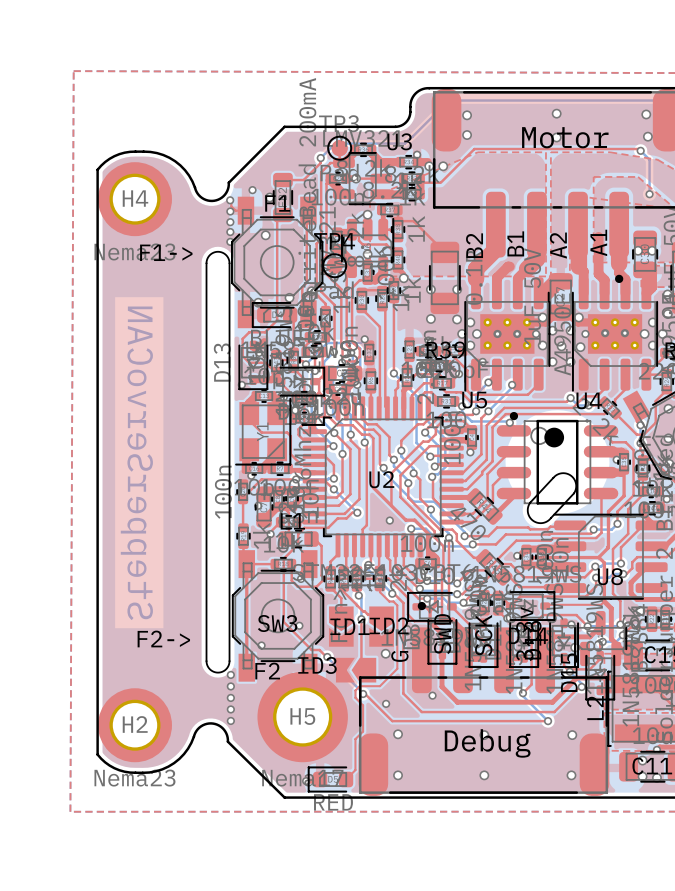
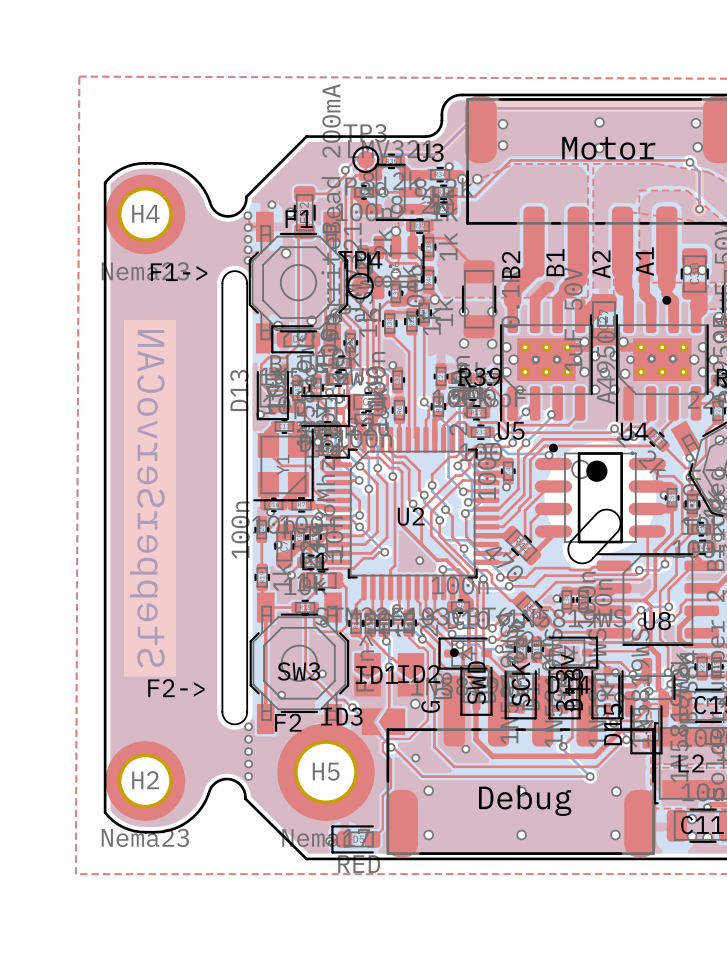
L2 name rotation: 0° (595, 708) -> 90° clockwise (691, 763)
L2 name position: L2 (595, 708) -> L2 (691, 763)

